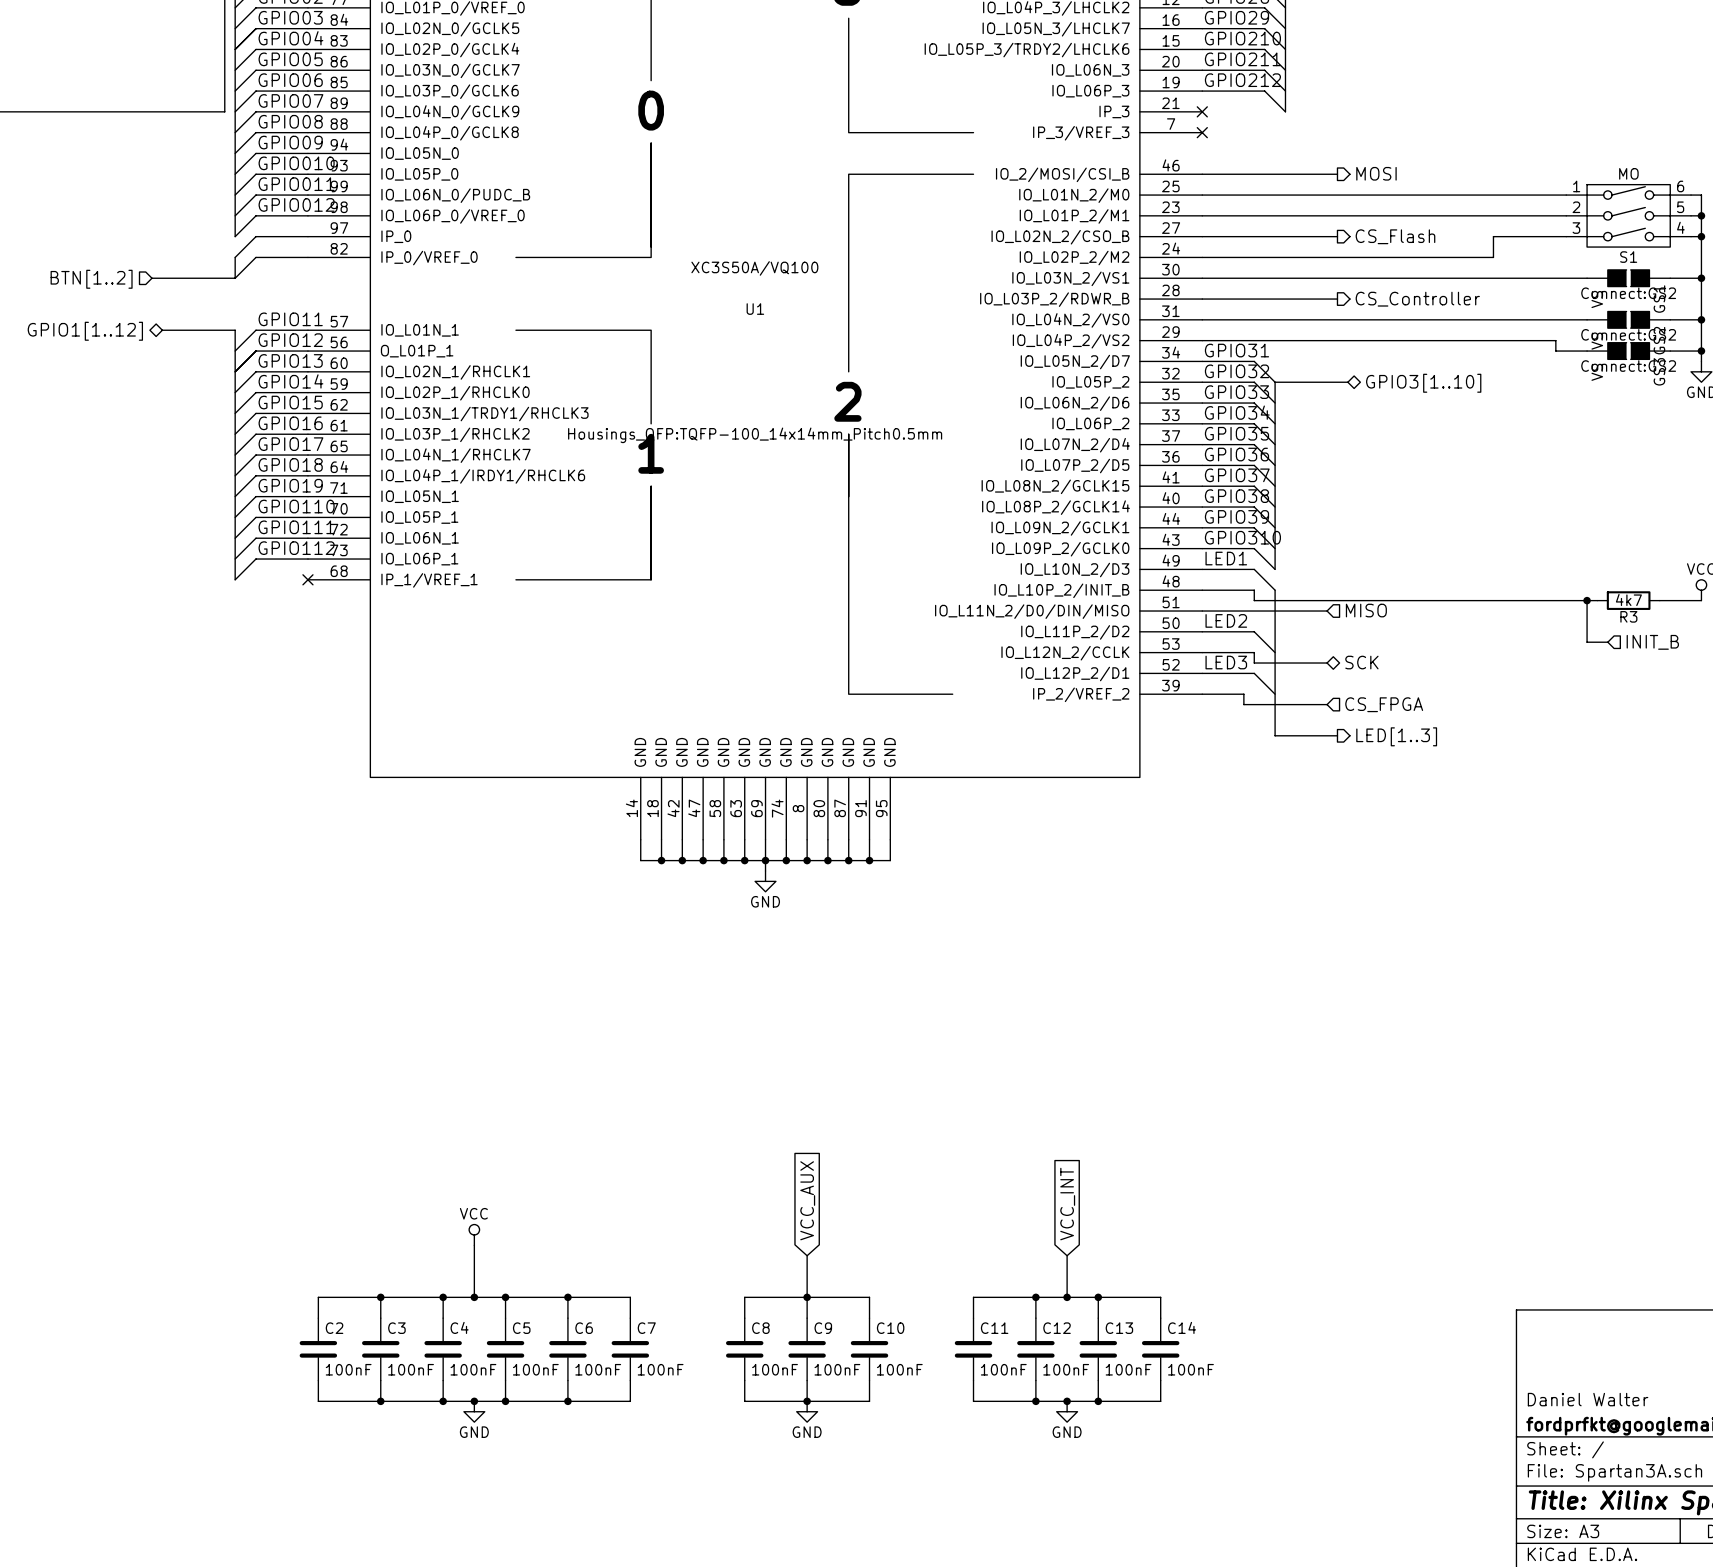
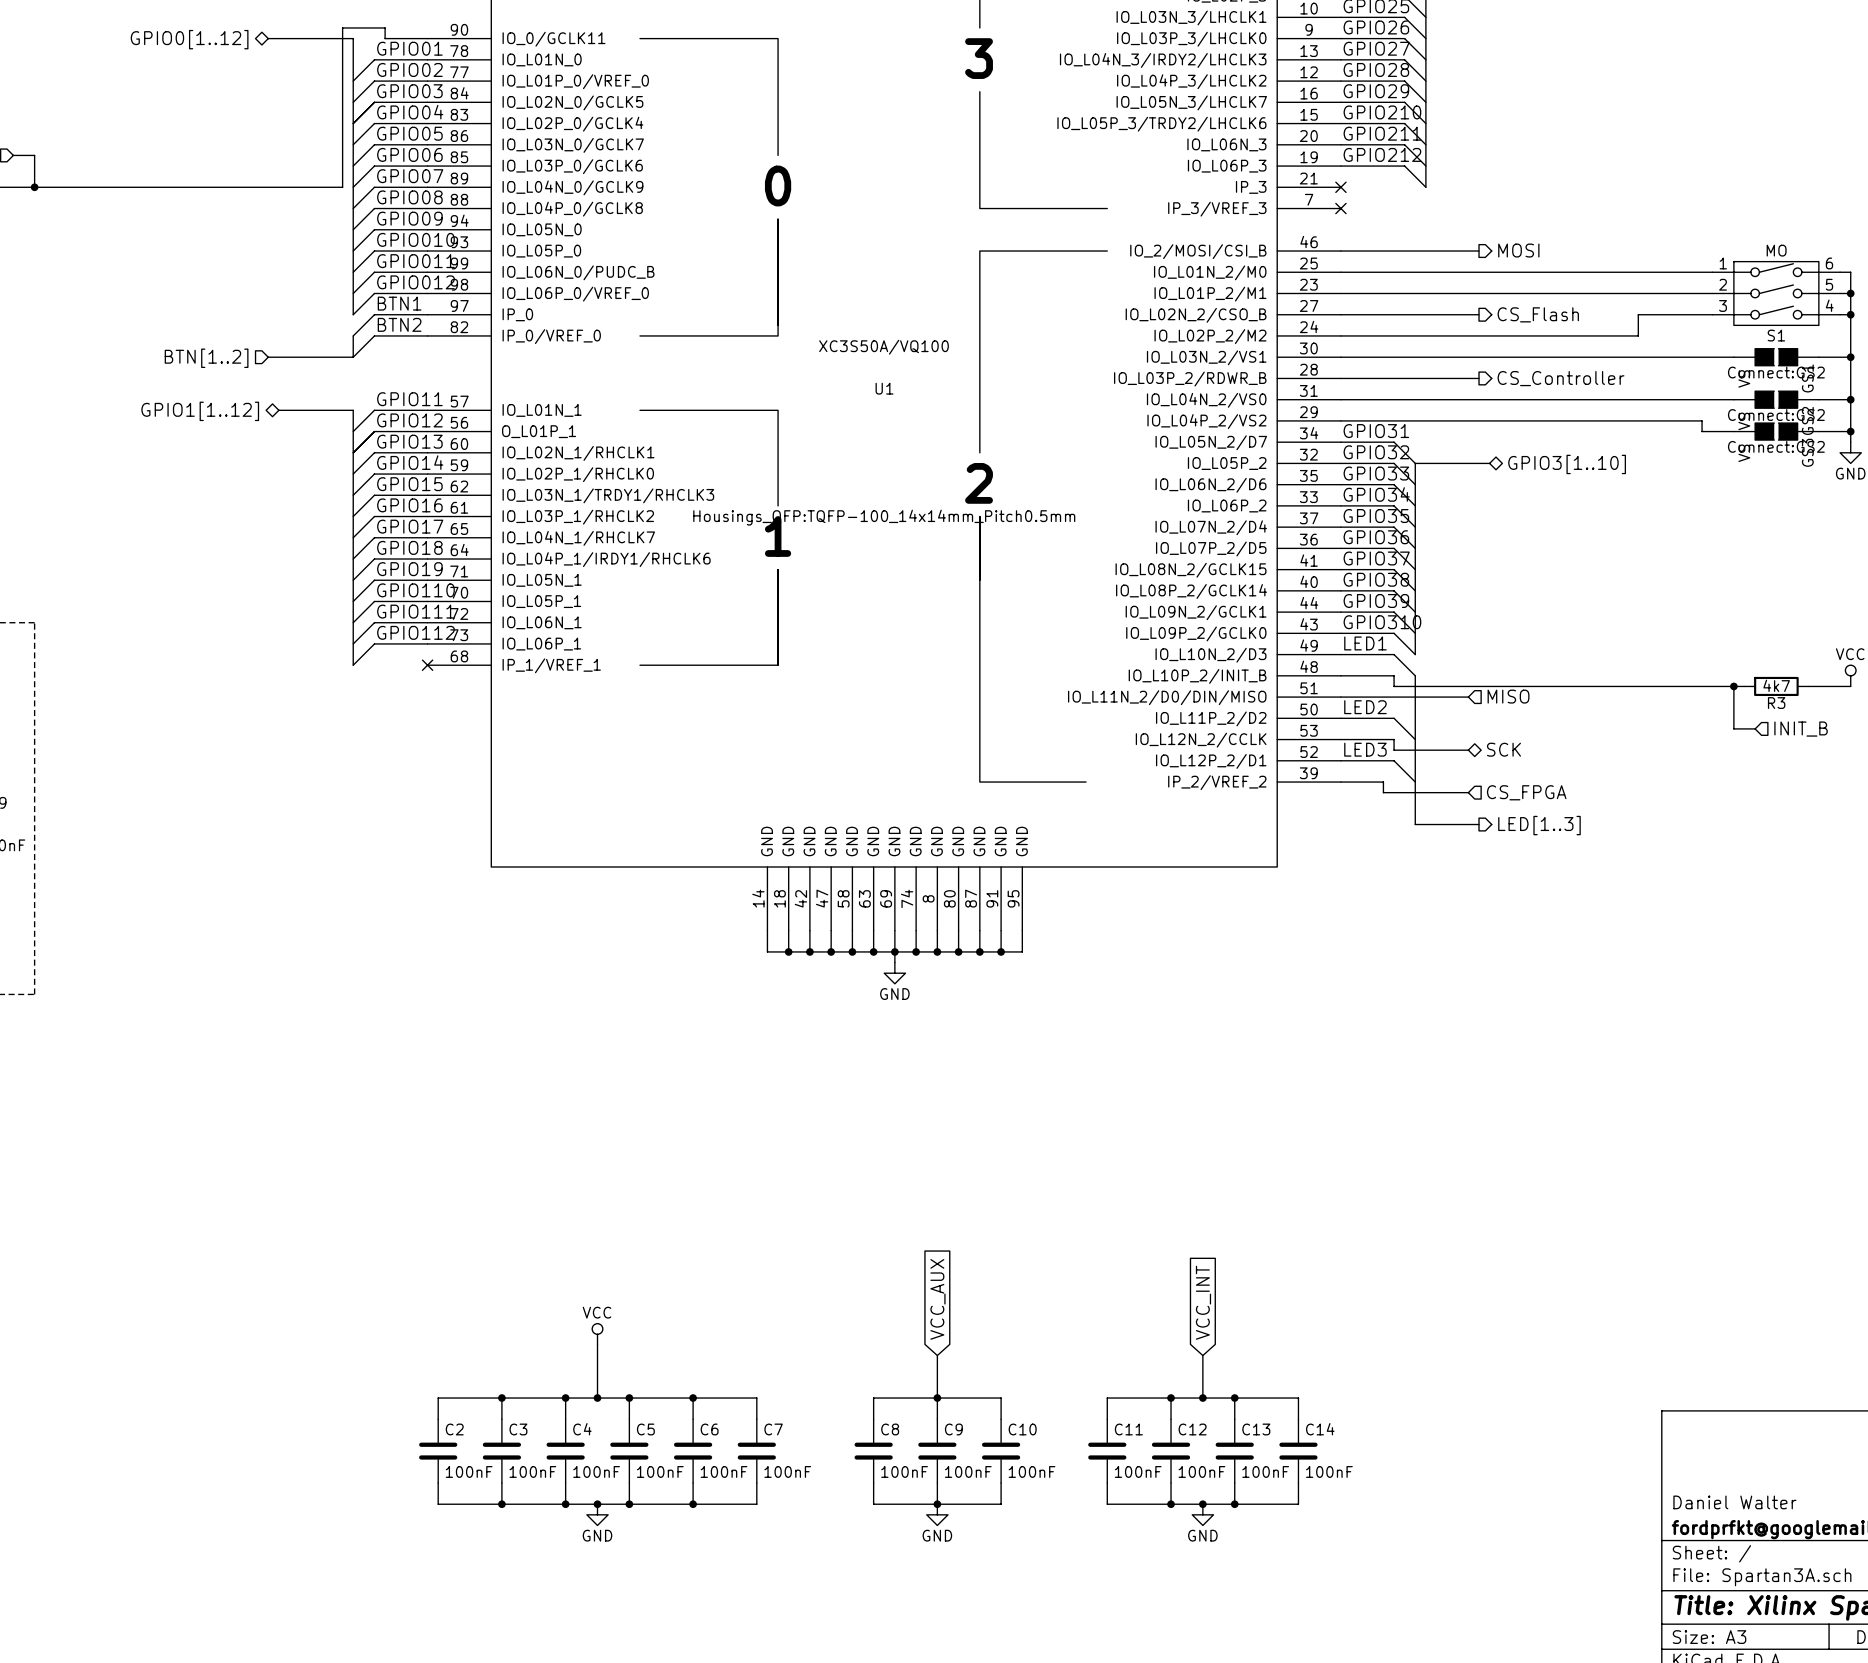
label: none -> BTN1 (399, 303)
label: none -> BTN2 (399, 324)

